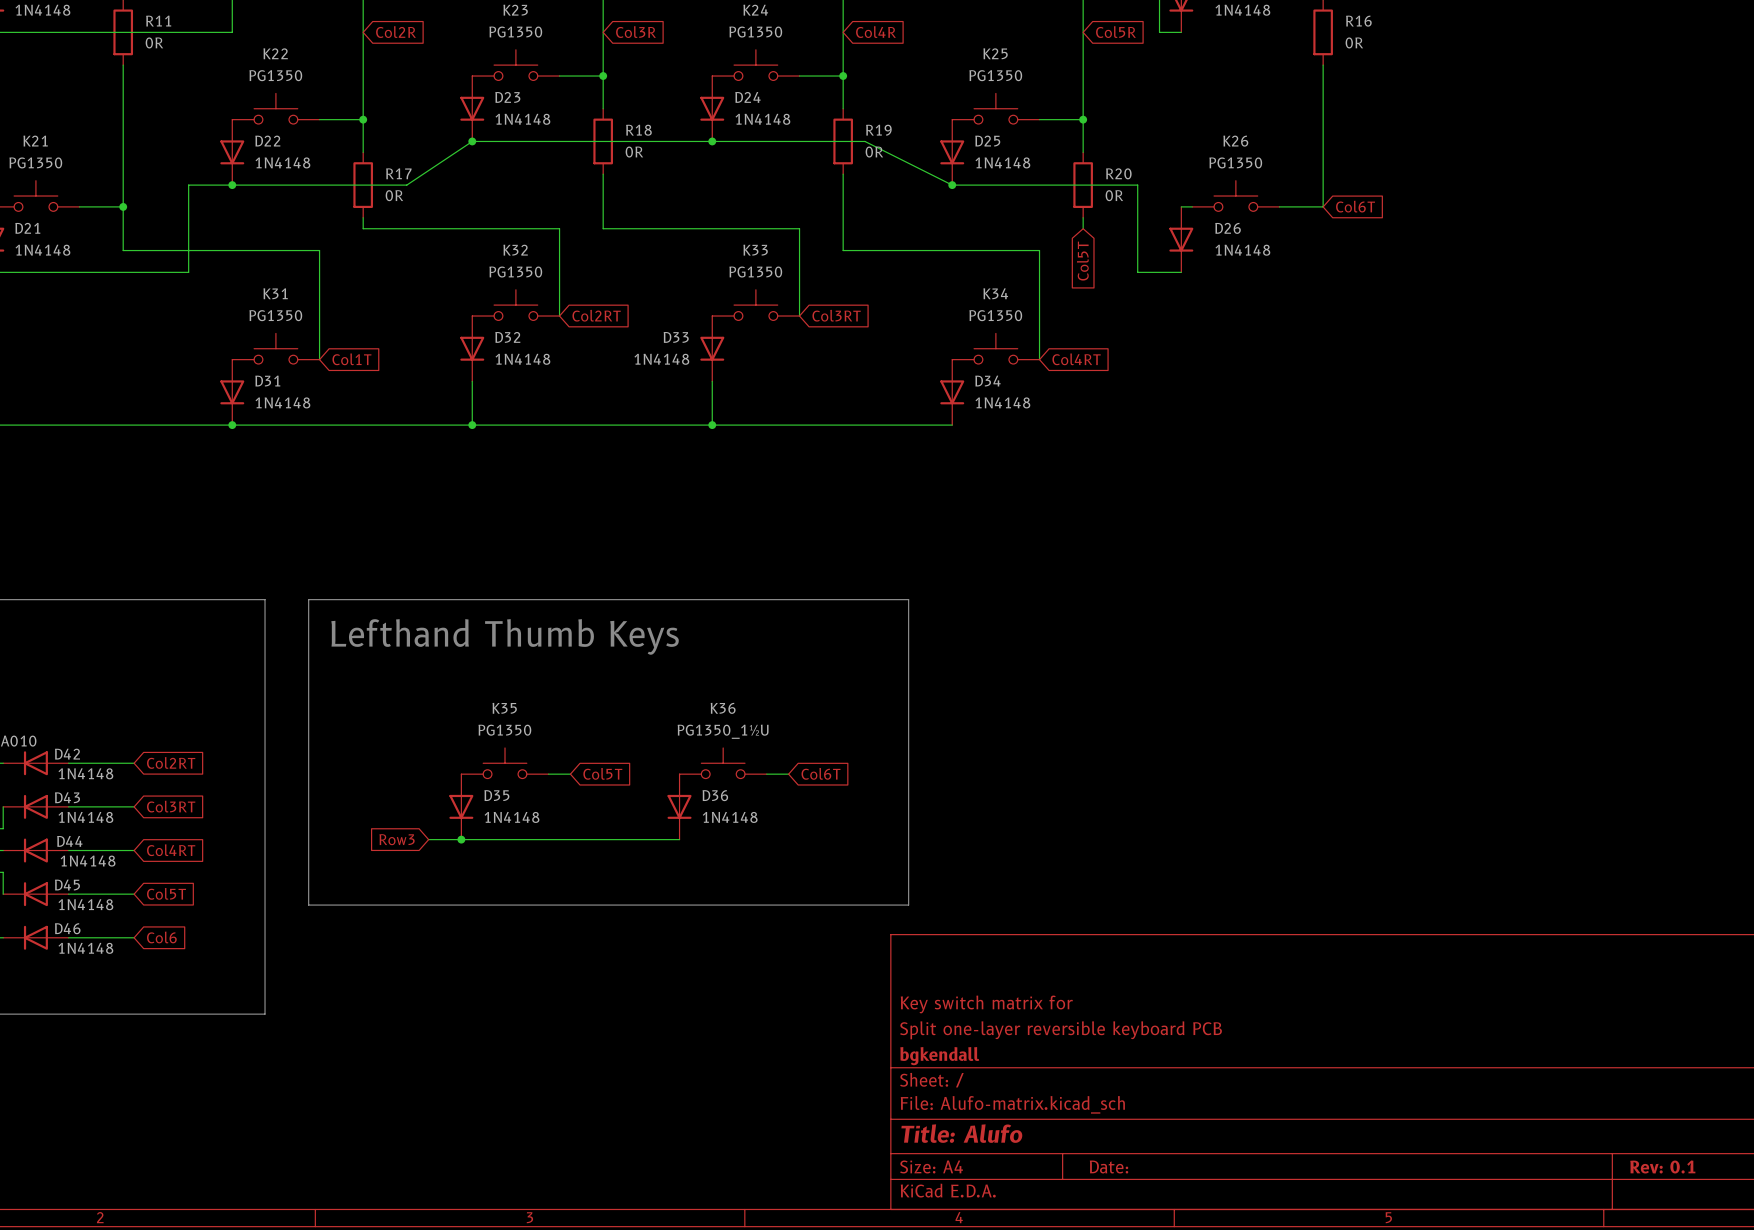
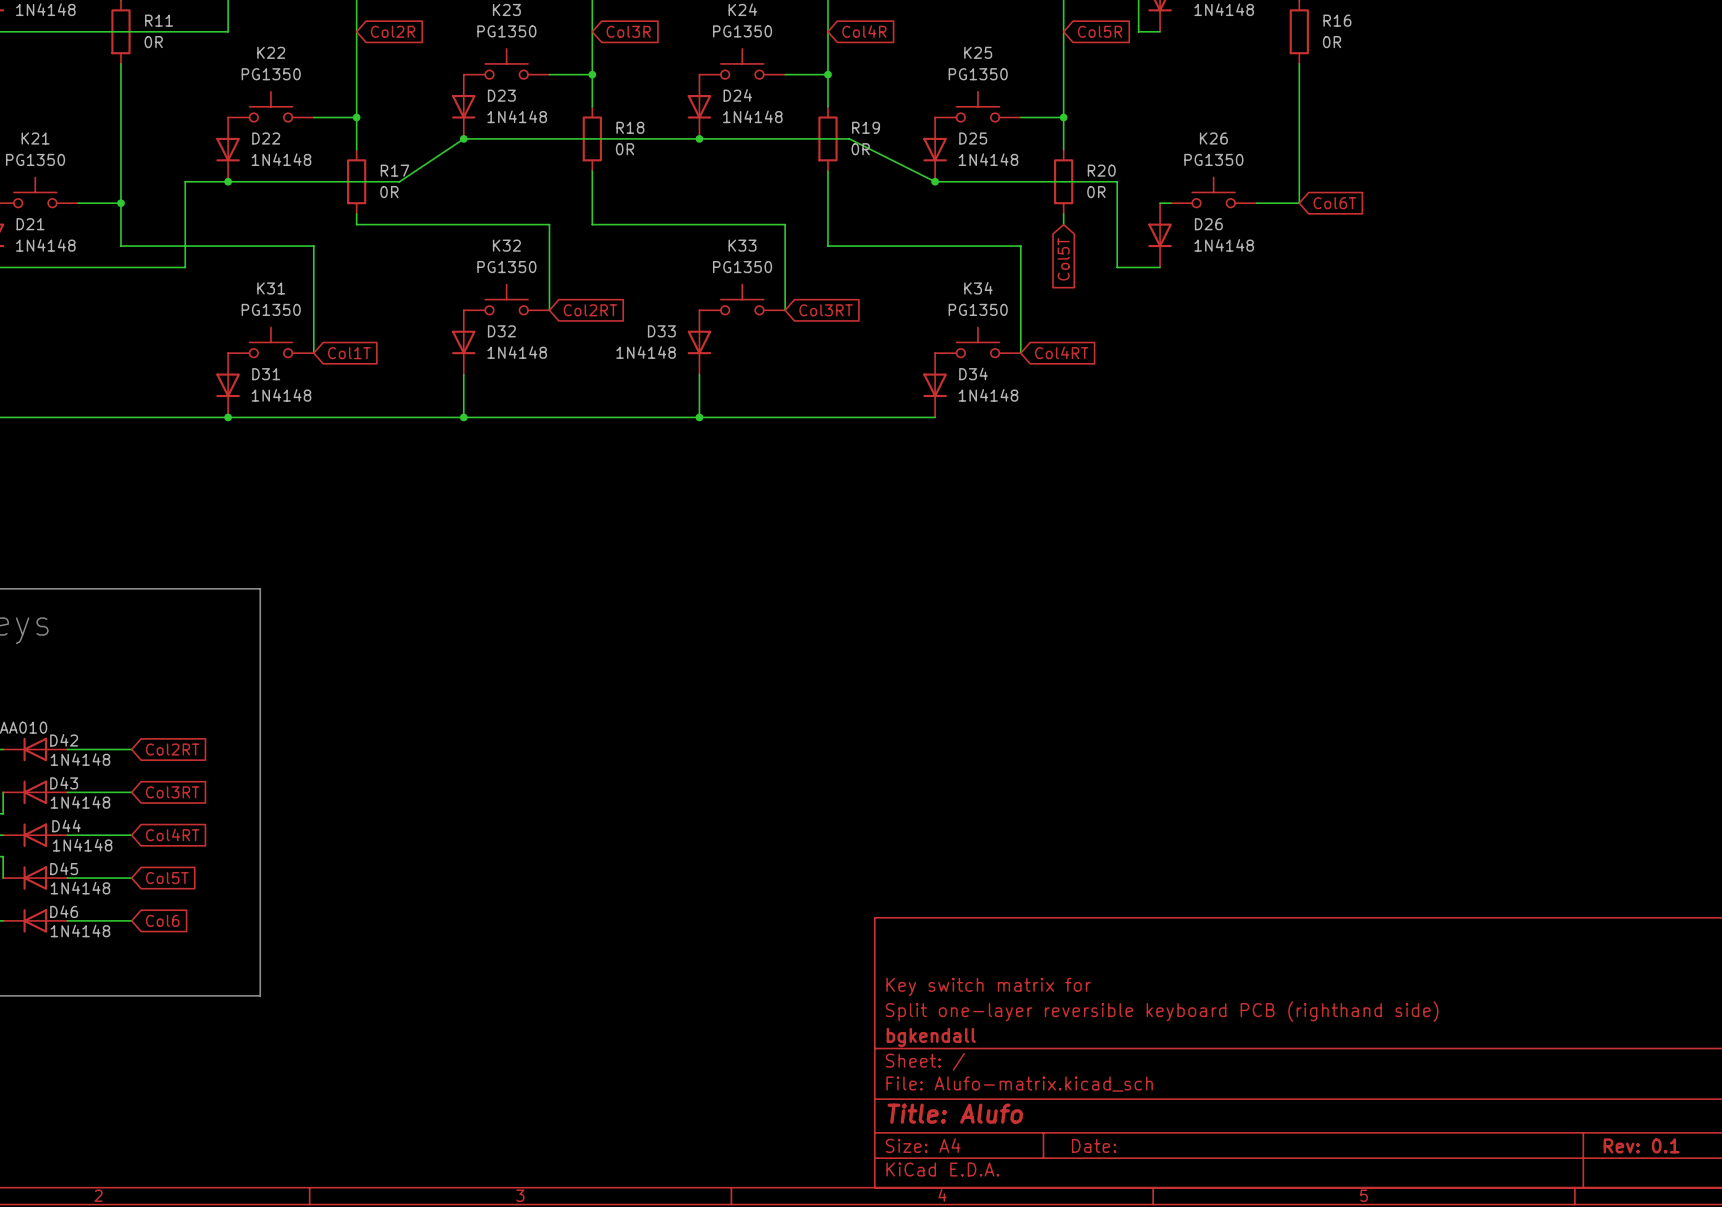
line: (308, 599) (908, 599) (908, 905) (308, 905) (308, 599) -> none
text: Lefthand Thumb Keys (505, 636) -> none
K35: PG1350 (505, 763) -> none
K36: PG1350_1½U (723, 763) -> none
global label: Col5T (602, 773) -> none
global label: Col6T (821, 773) -> none
wire: (548, 774) (570, 774) -> none
wire: (766, 774) (788, 774) -> none
D35: 1N4148 (461, 806) -> none
D36: 1N4148 (679, 806) -> none
global label: Row3 (397, 839) -> none
wire: (428, 839) (679, 839) -> none
junction: (461, 839) -> none
title block: Split one-layer reversible keyboard PCB (1061, 1030) -> Split one-layer reversible keyboard PCB (righthand side) (1162, 1011)

